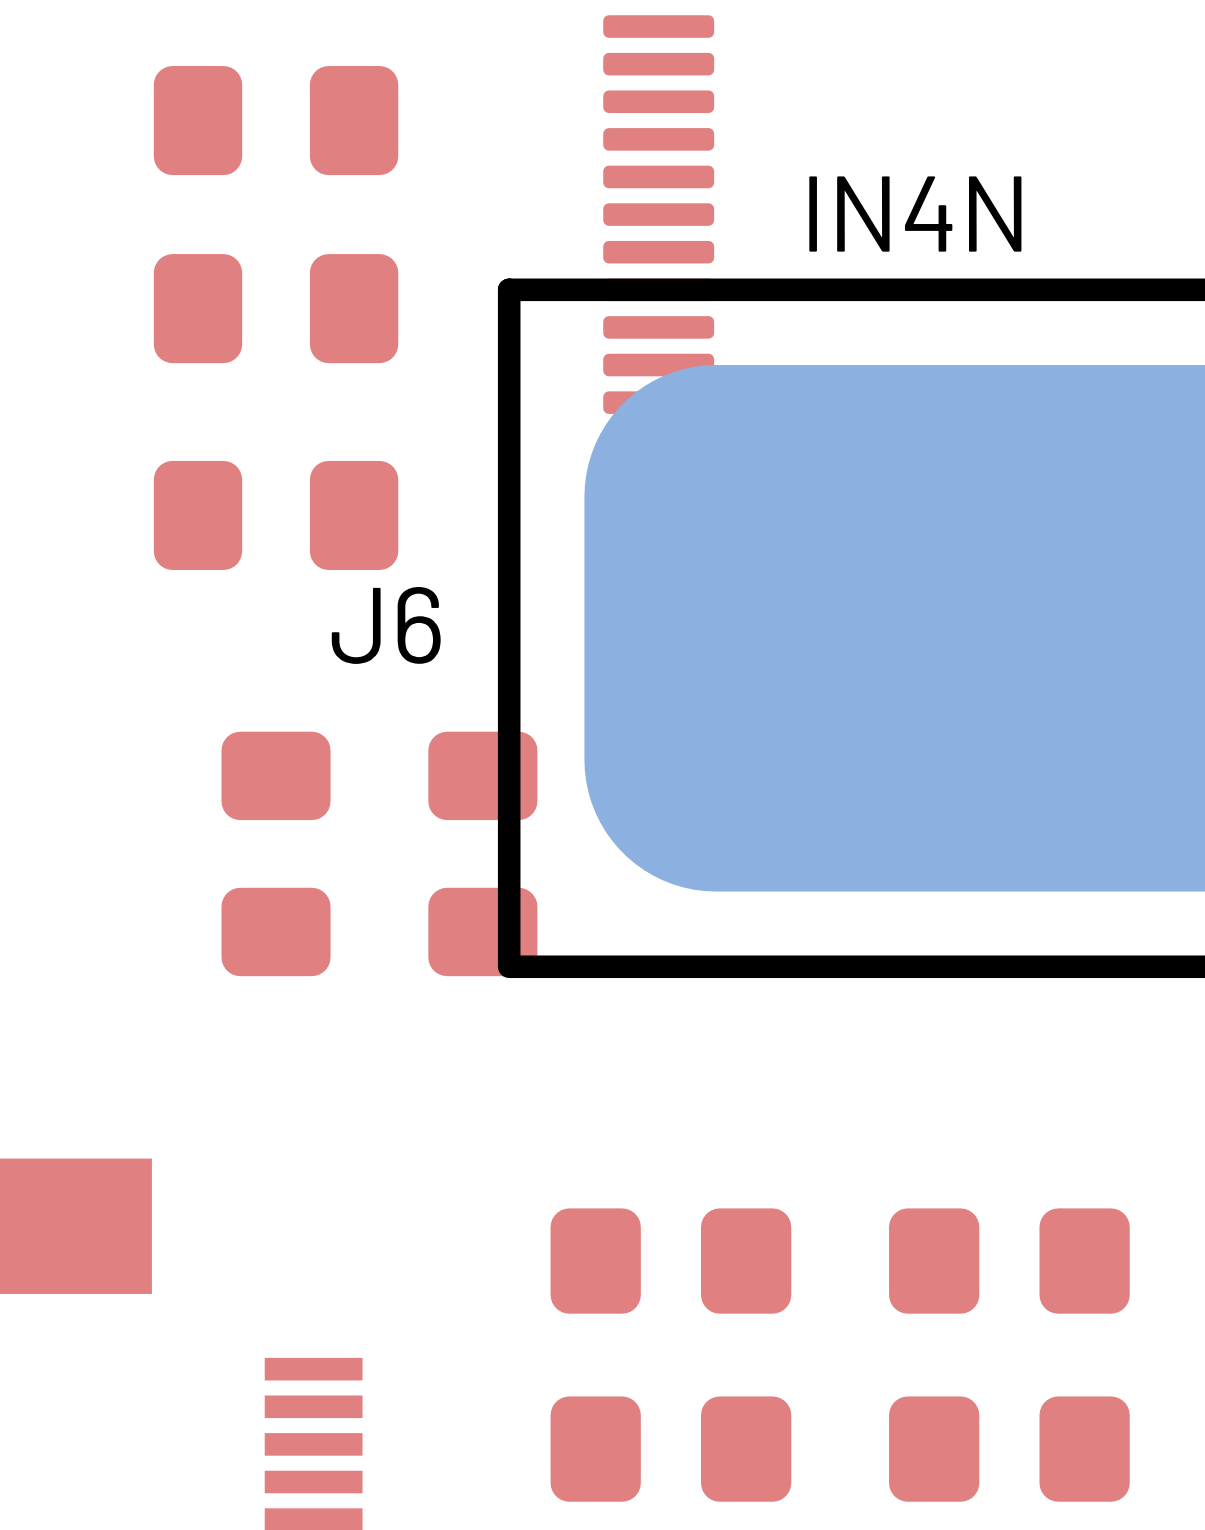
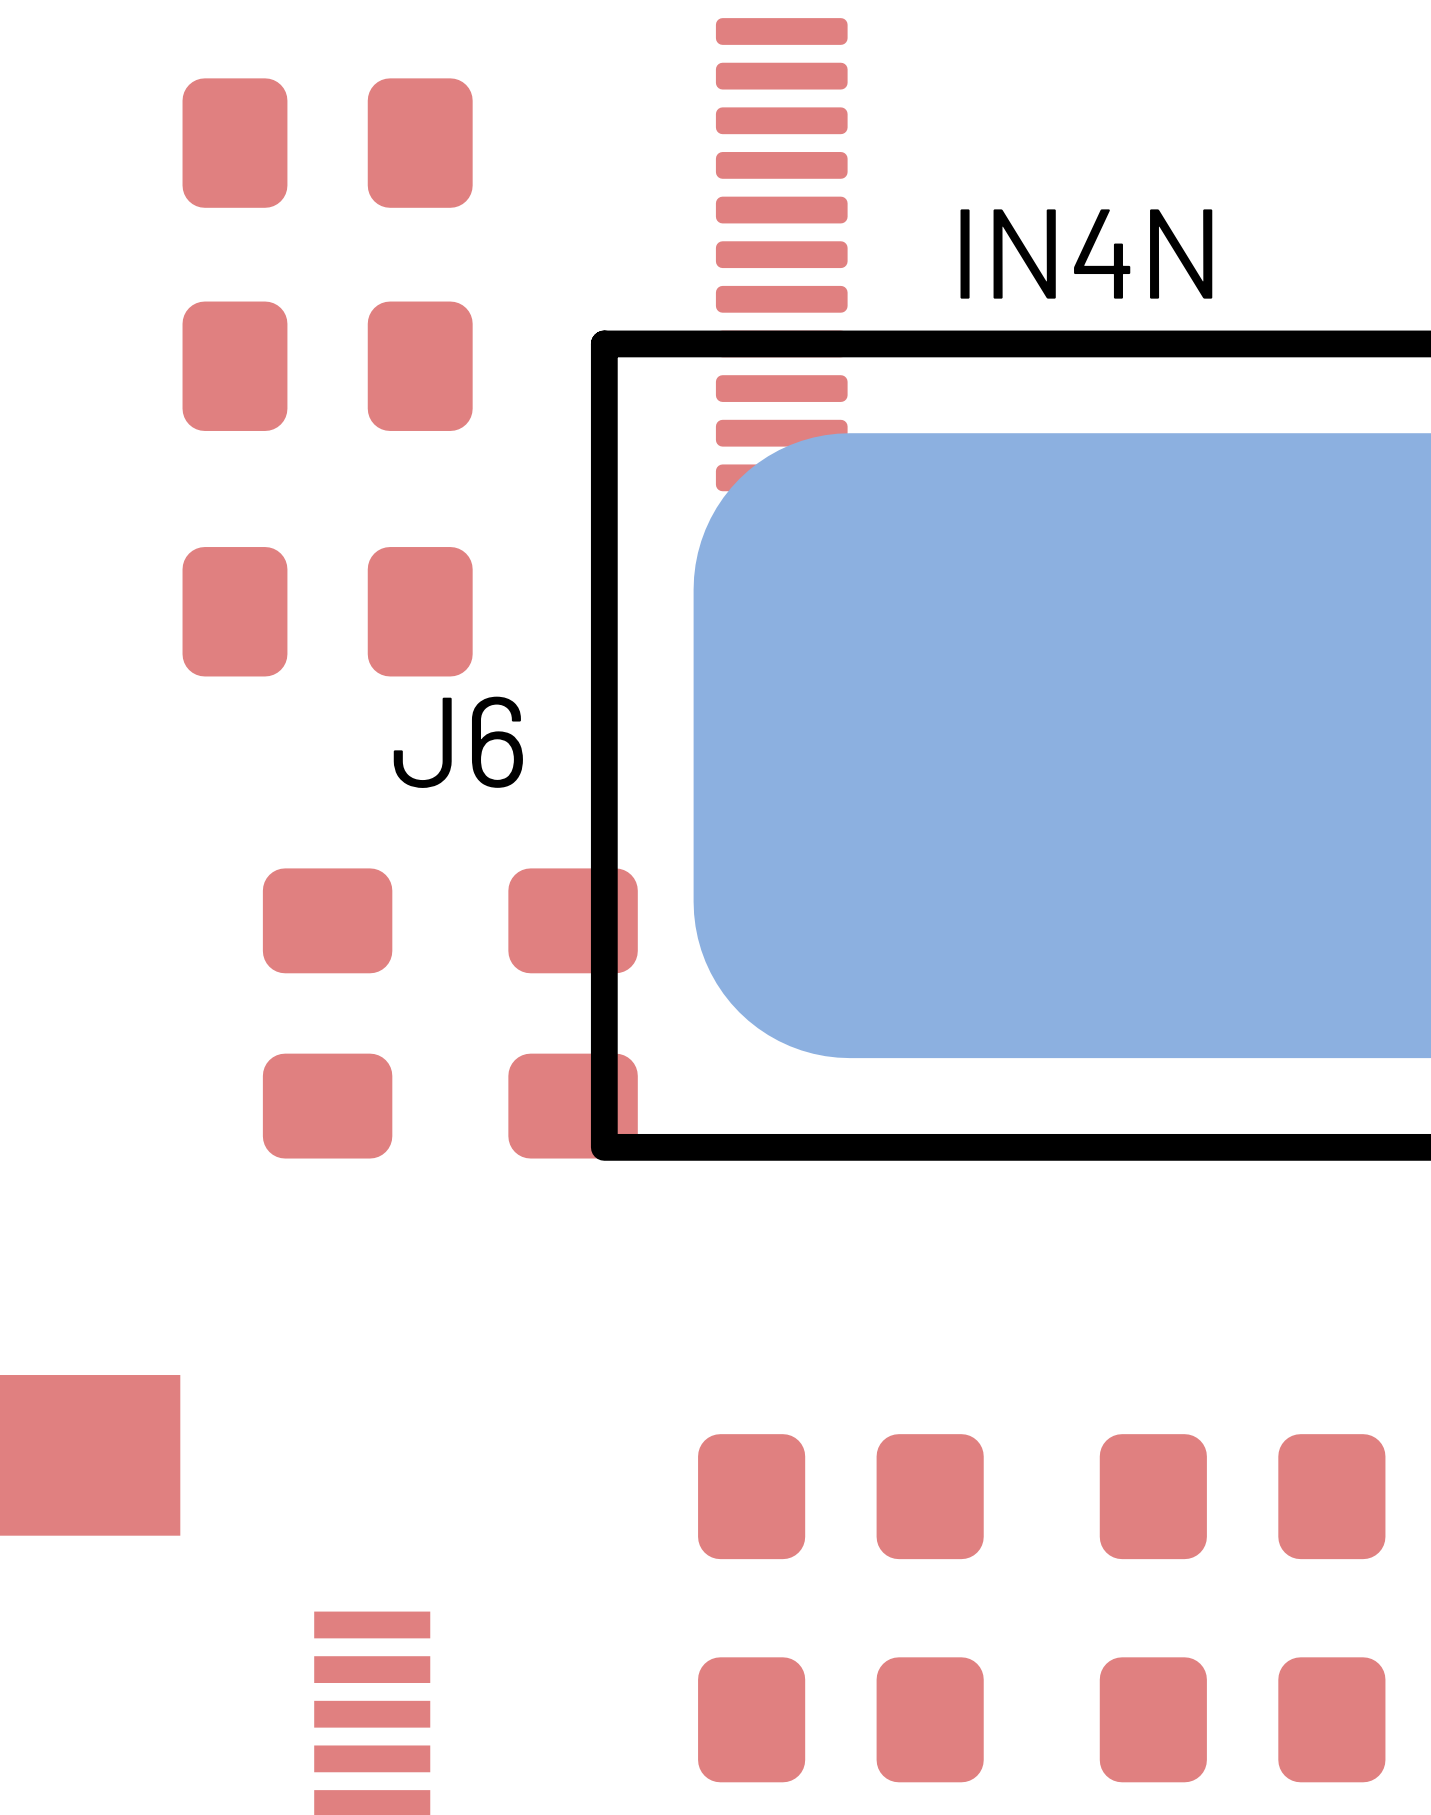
part position: (670, 1261) -> (840, 1496)
part position: (1009, 1261) -> (1242, 1496)
part position: (670, 1449) -> (840, 1719)
part position: (1009, 1449) -> (1242, 1719)

